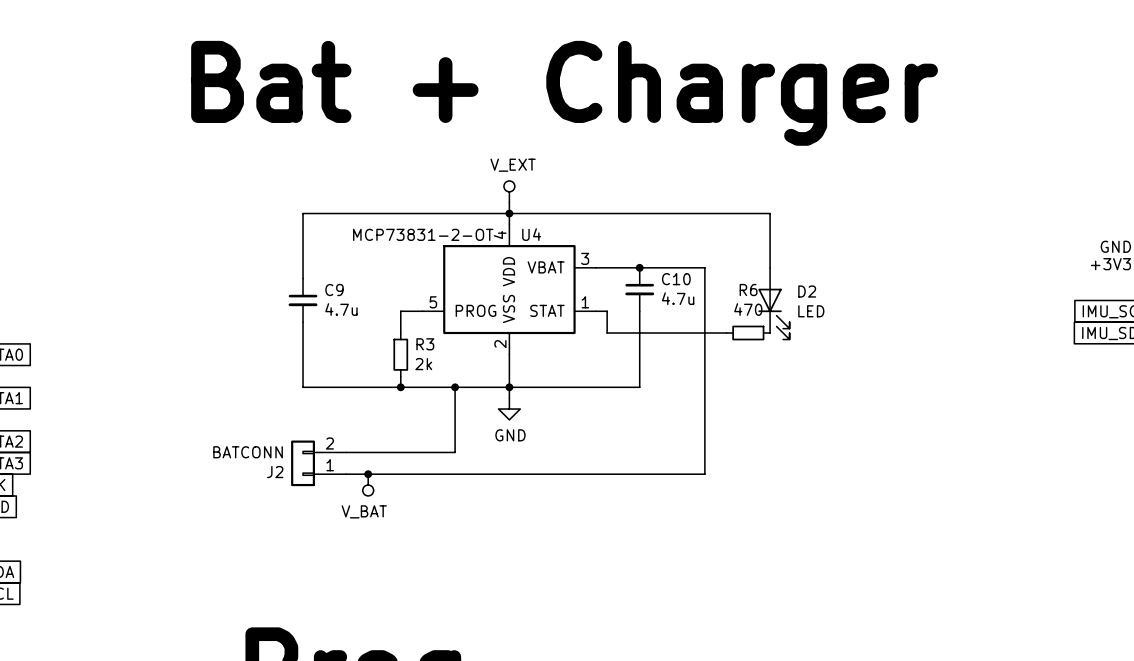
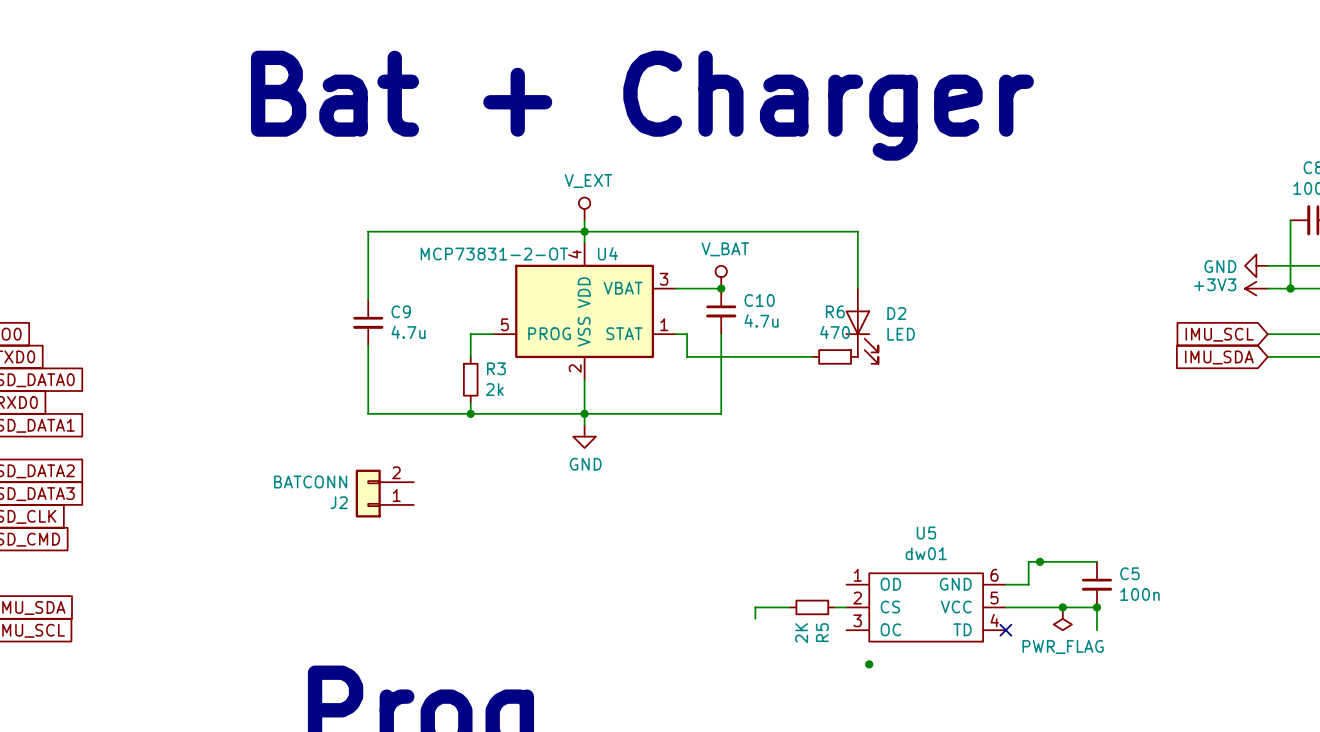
power symbol: none -> V_BAT (721, 277)
wire: (639, 267) (704, 267) (704, 474) (346, 474) -> none
wire: (455, 387) (455, 452) (346, 452) -> none
junction: (455, 387) -> none
junction: (368, 474) -> none
power symbol: V_BAT (368, 485) -> none
junction: none -> (1040, 561)
wire: none -> (1096, 561) (1028, 561) (1028, 584) (1005, 584)
C5: none -> 100n (1096, 584)
wire: none -> (789, 607) (755, 607) (755, 618)
R5: none -> 2K (812, 607)
wire: none -> (835, 607) (846, 607)
U5: none -> dw01 (926, 607)
wire: none -> (1005, 607) (1096, 607) (1096, 630)
junction: none -> (1062, 607)
junction: none -> (1096, 607)
power symbol: none -> PWR_FLAG (1062, 618)
no-connect mark: none -> (1005, 630)
junction: none -> (869, 664)

